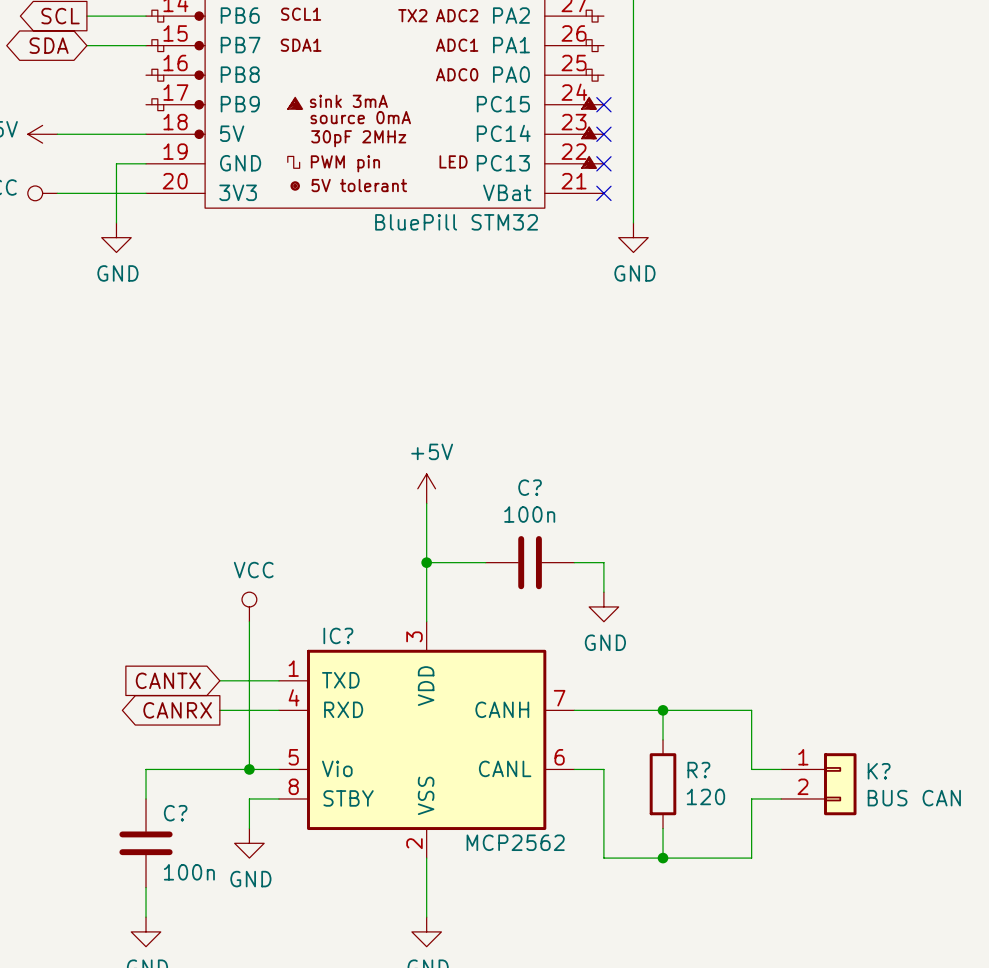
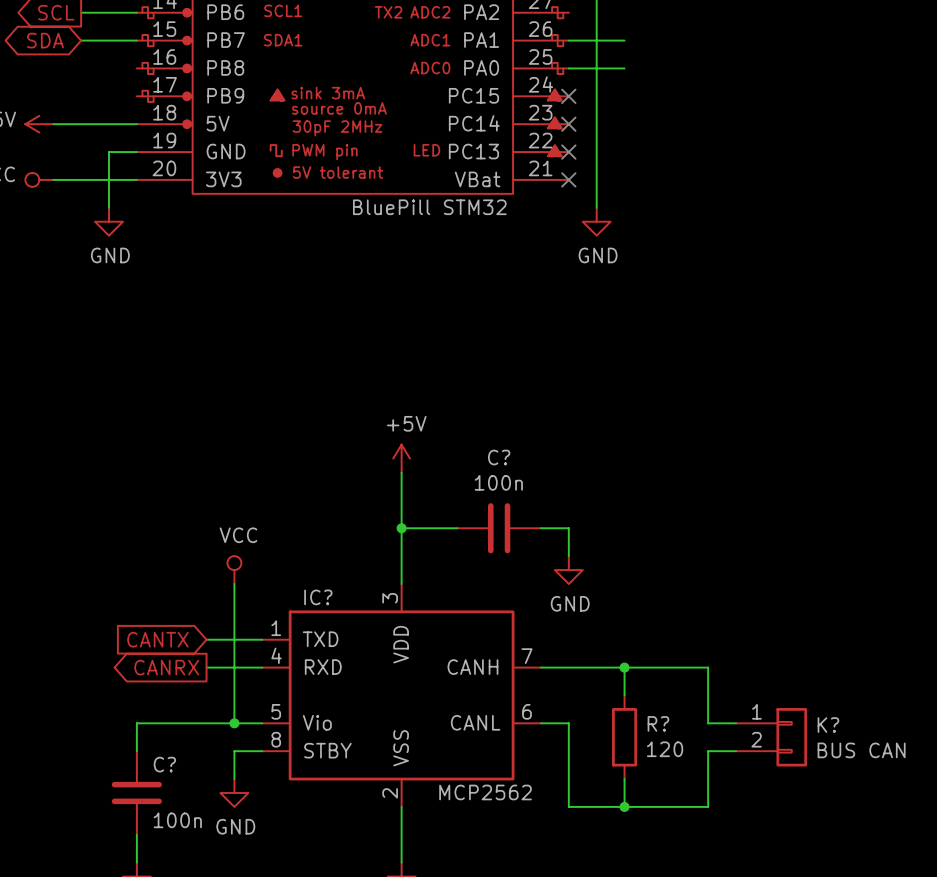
wire: none -> (568, 40) (624, 40)
wire: none -> (568, 68) (624, 68)

